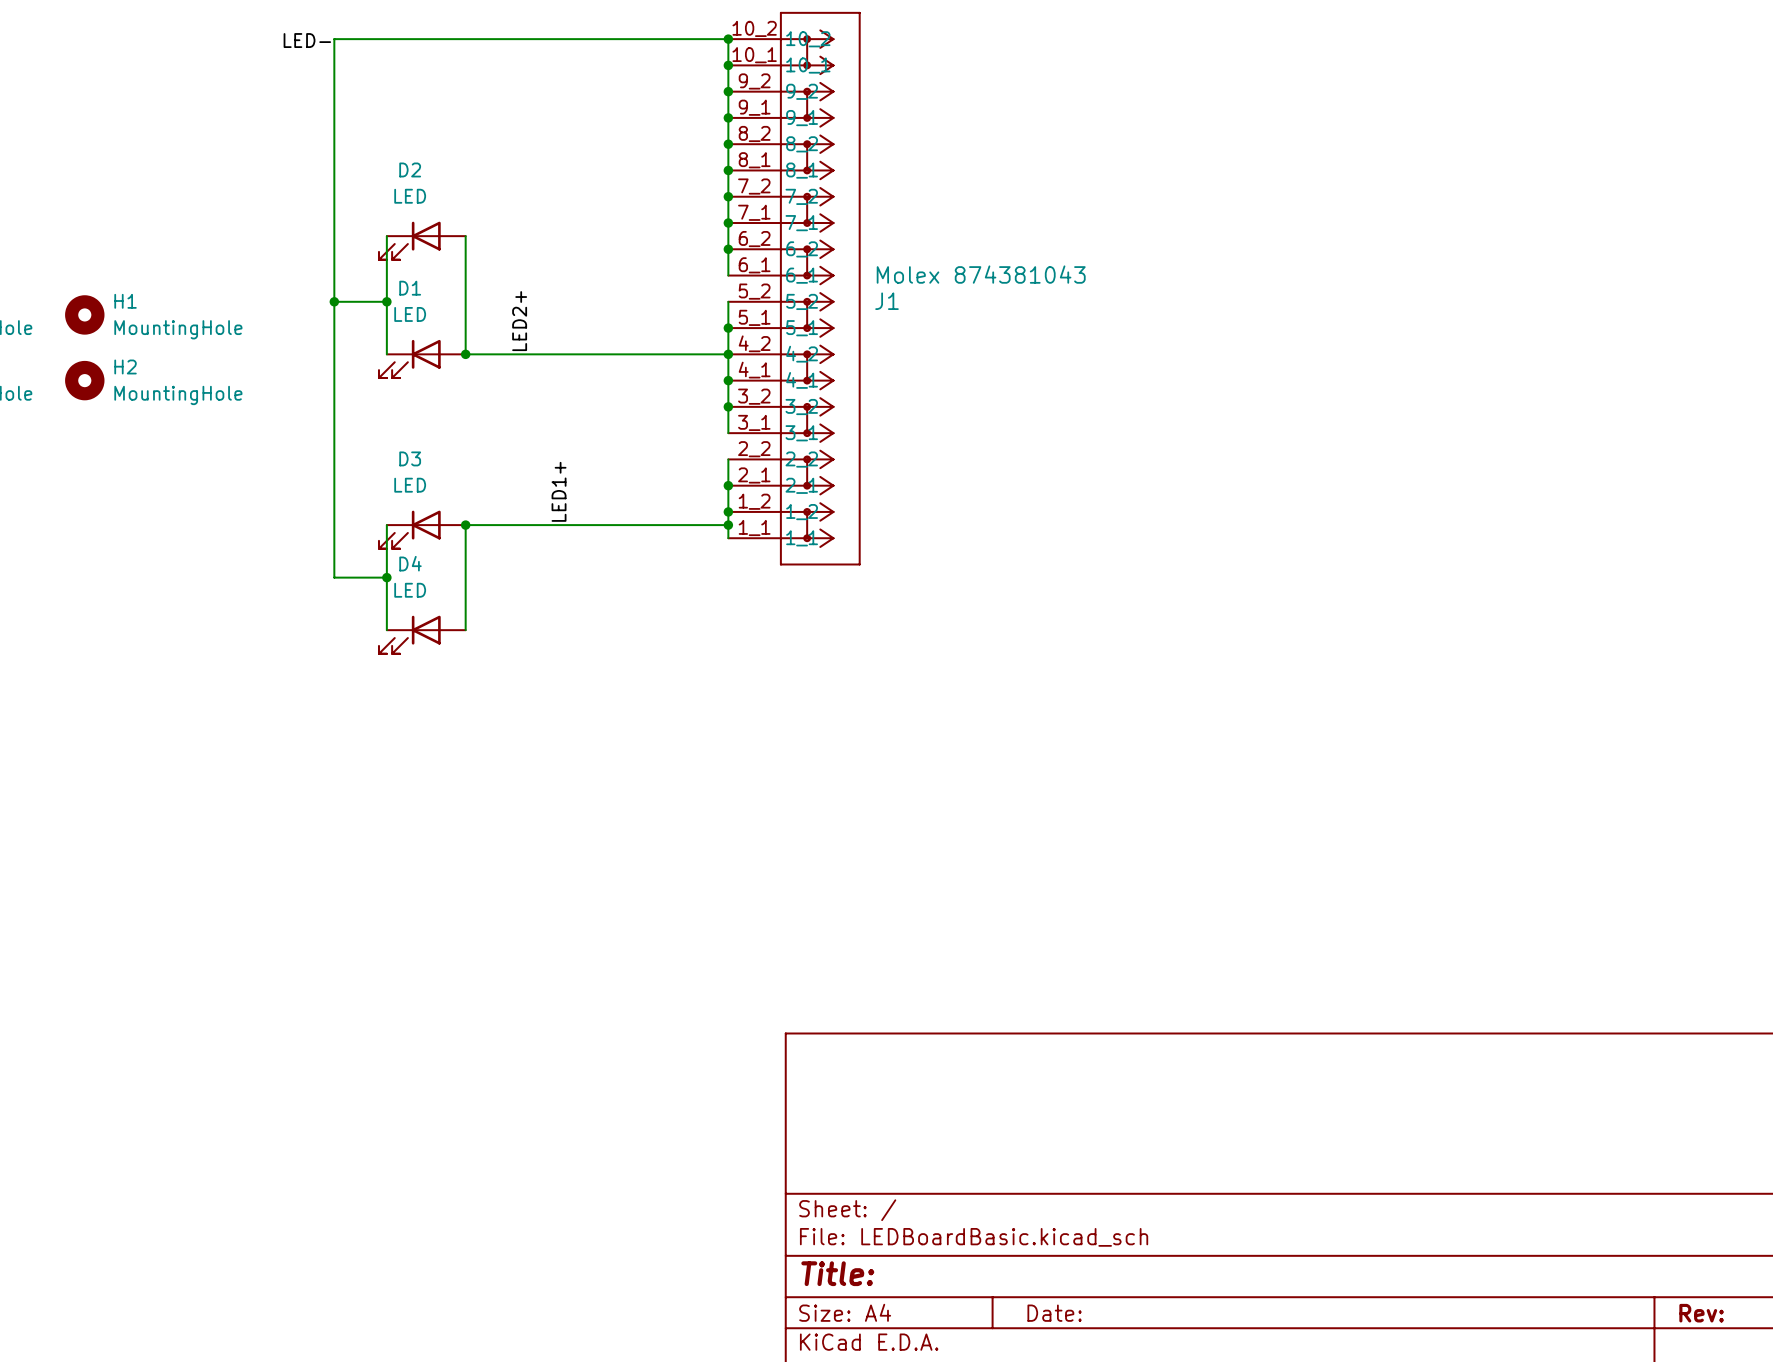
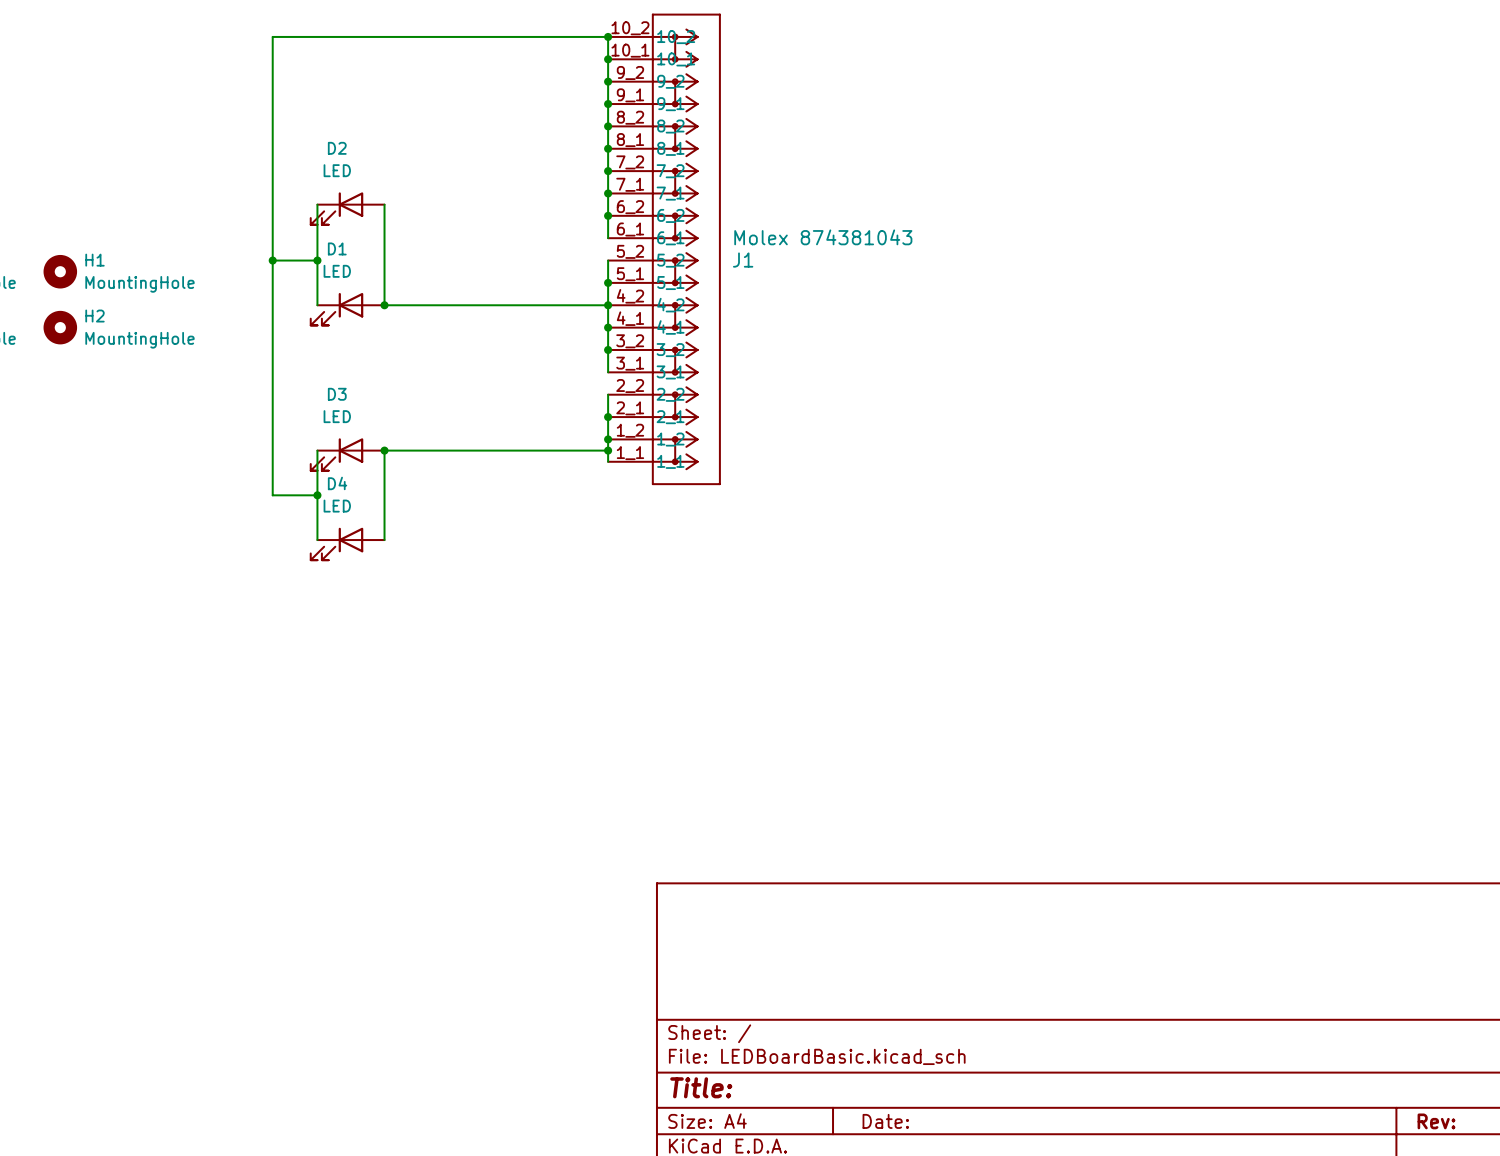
label: LED- (307, 40) -> none
label: LED2+ (519, 321) -> none
label: LED1+ (559, 491) -> none

